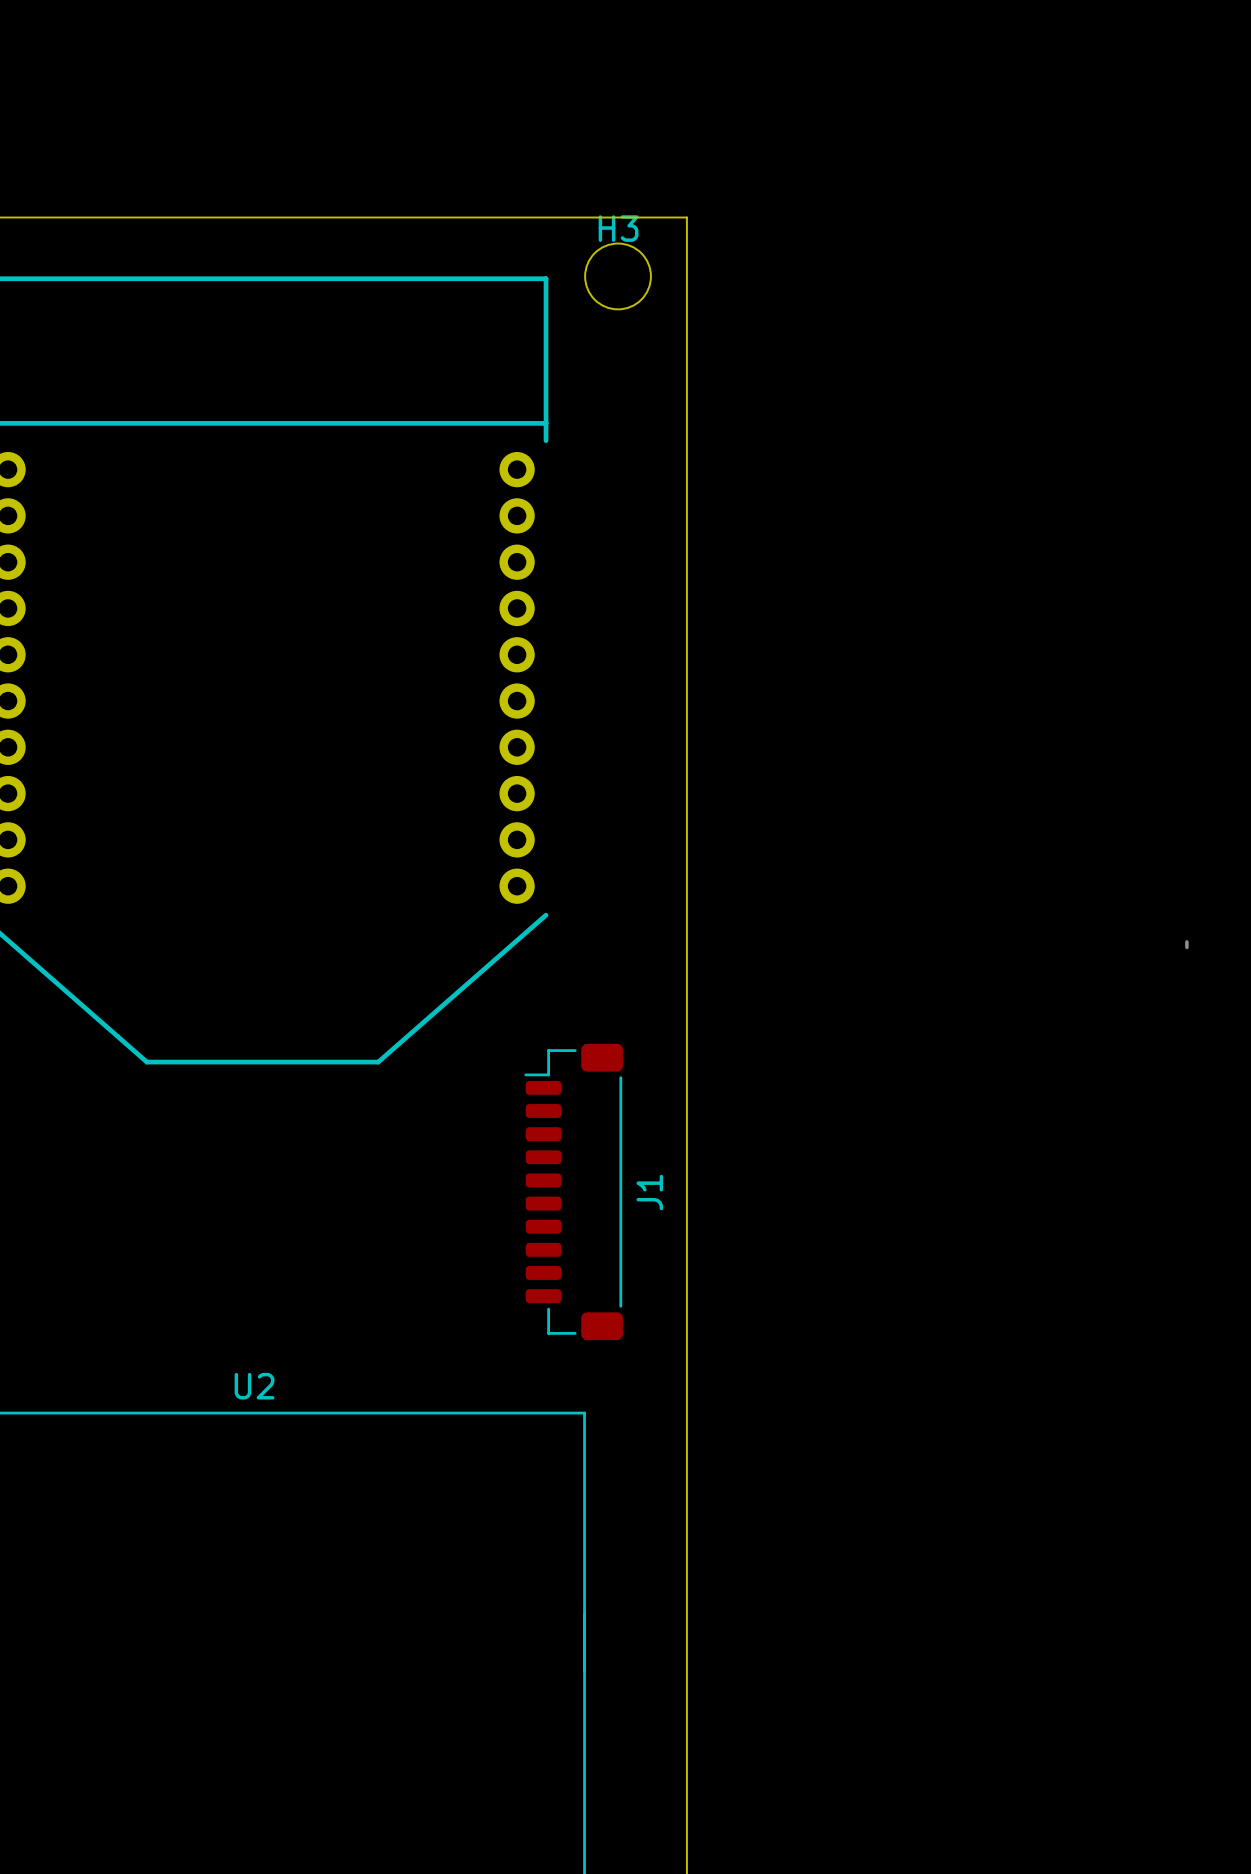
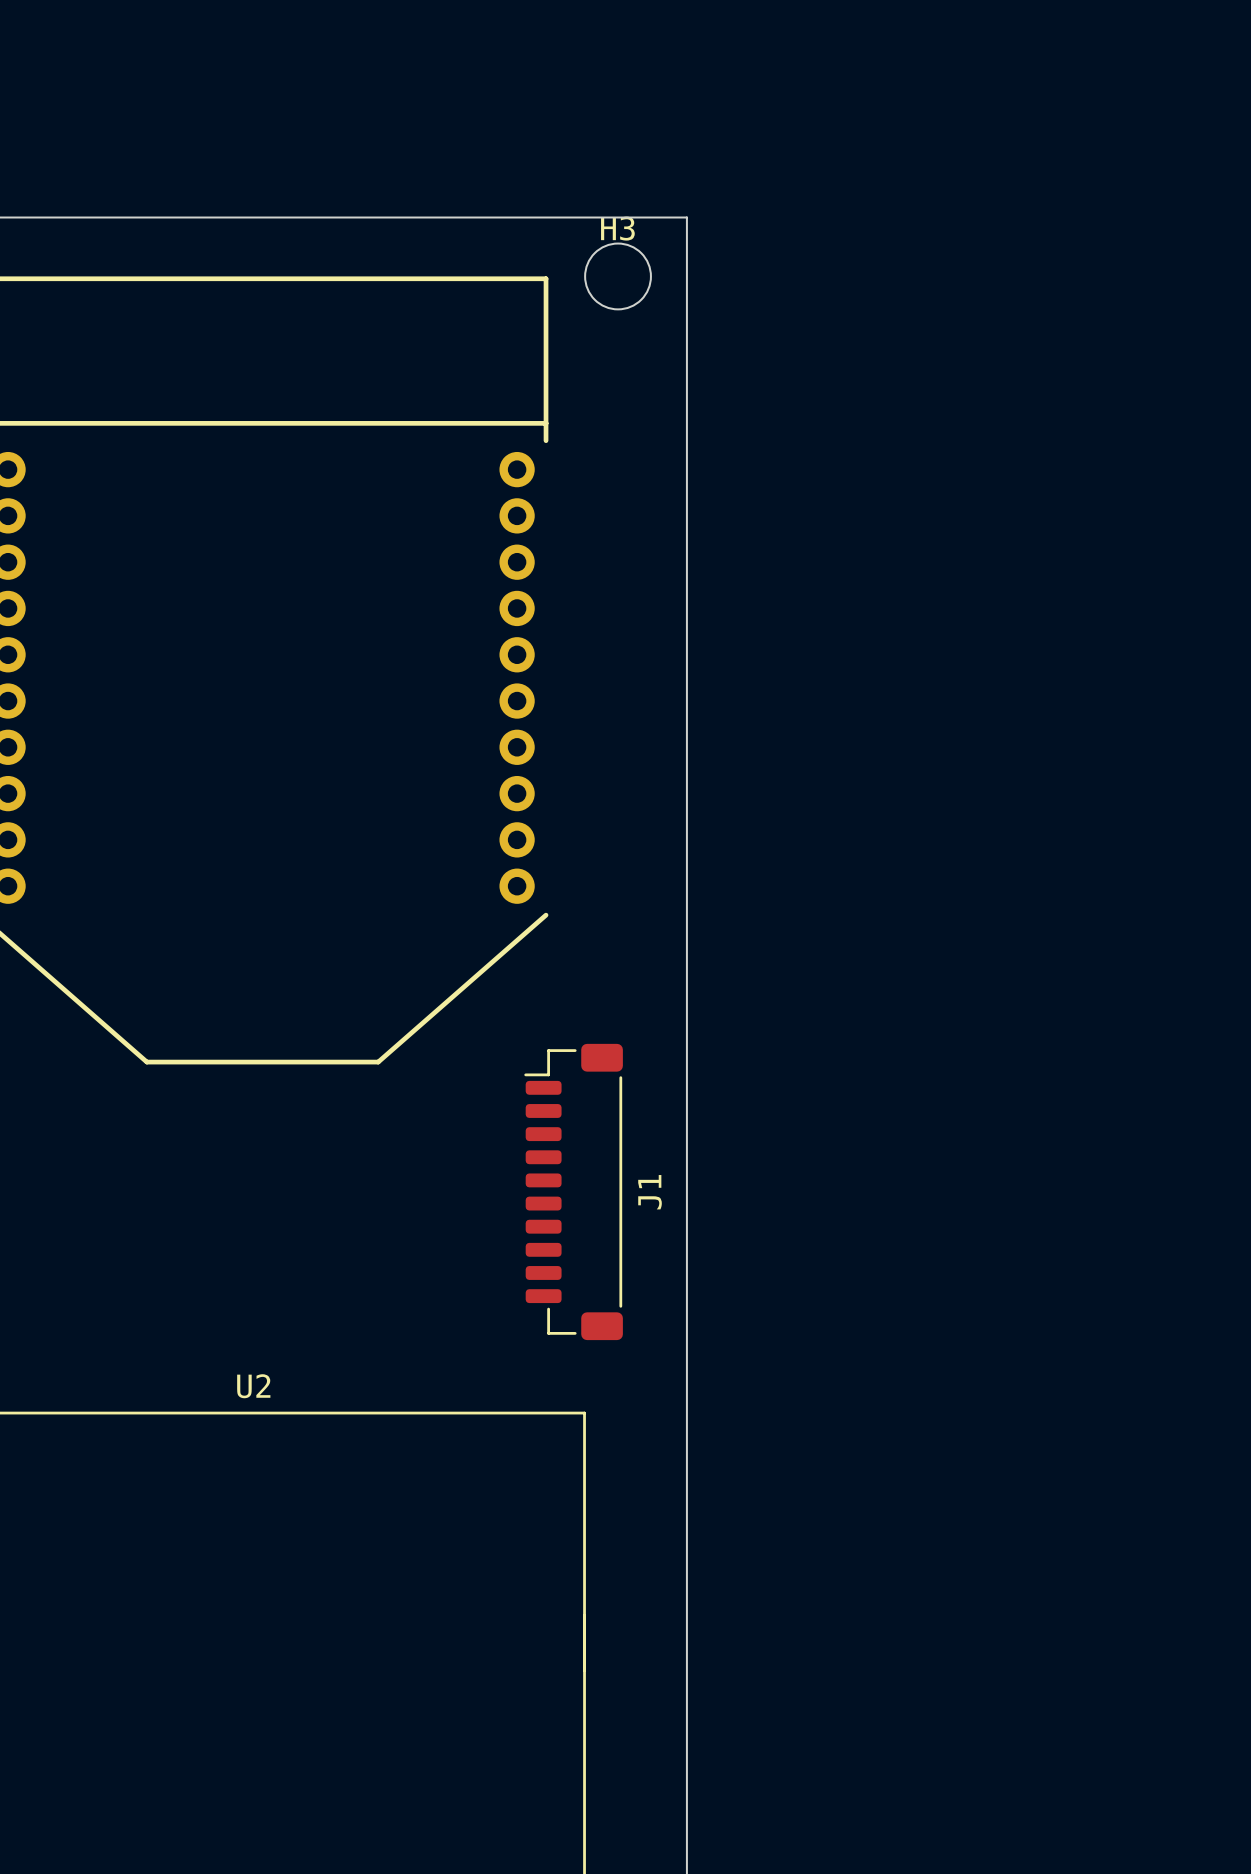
line: (1186, 941) (1186, 947) -> none

